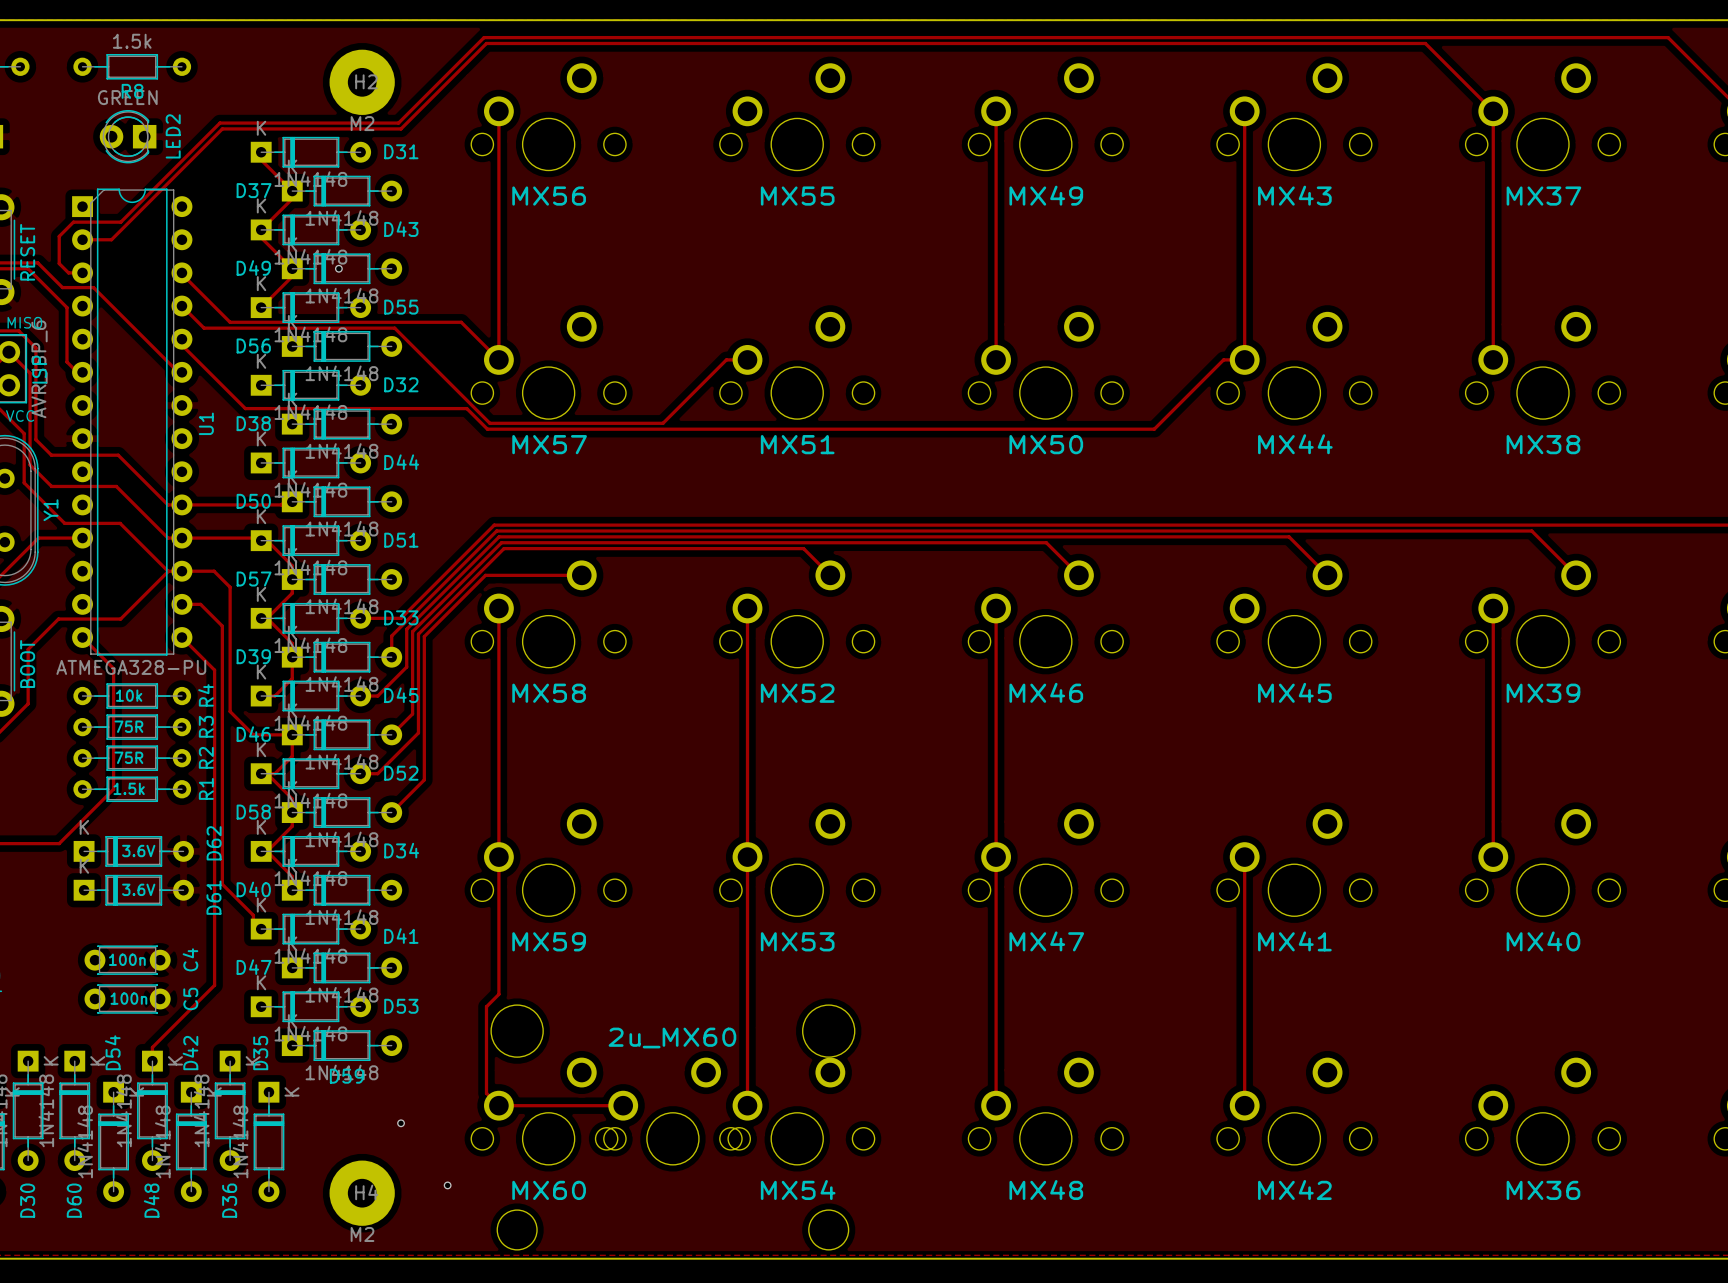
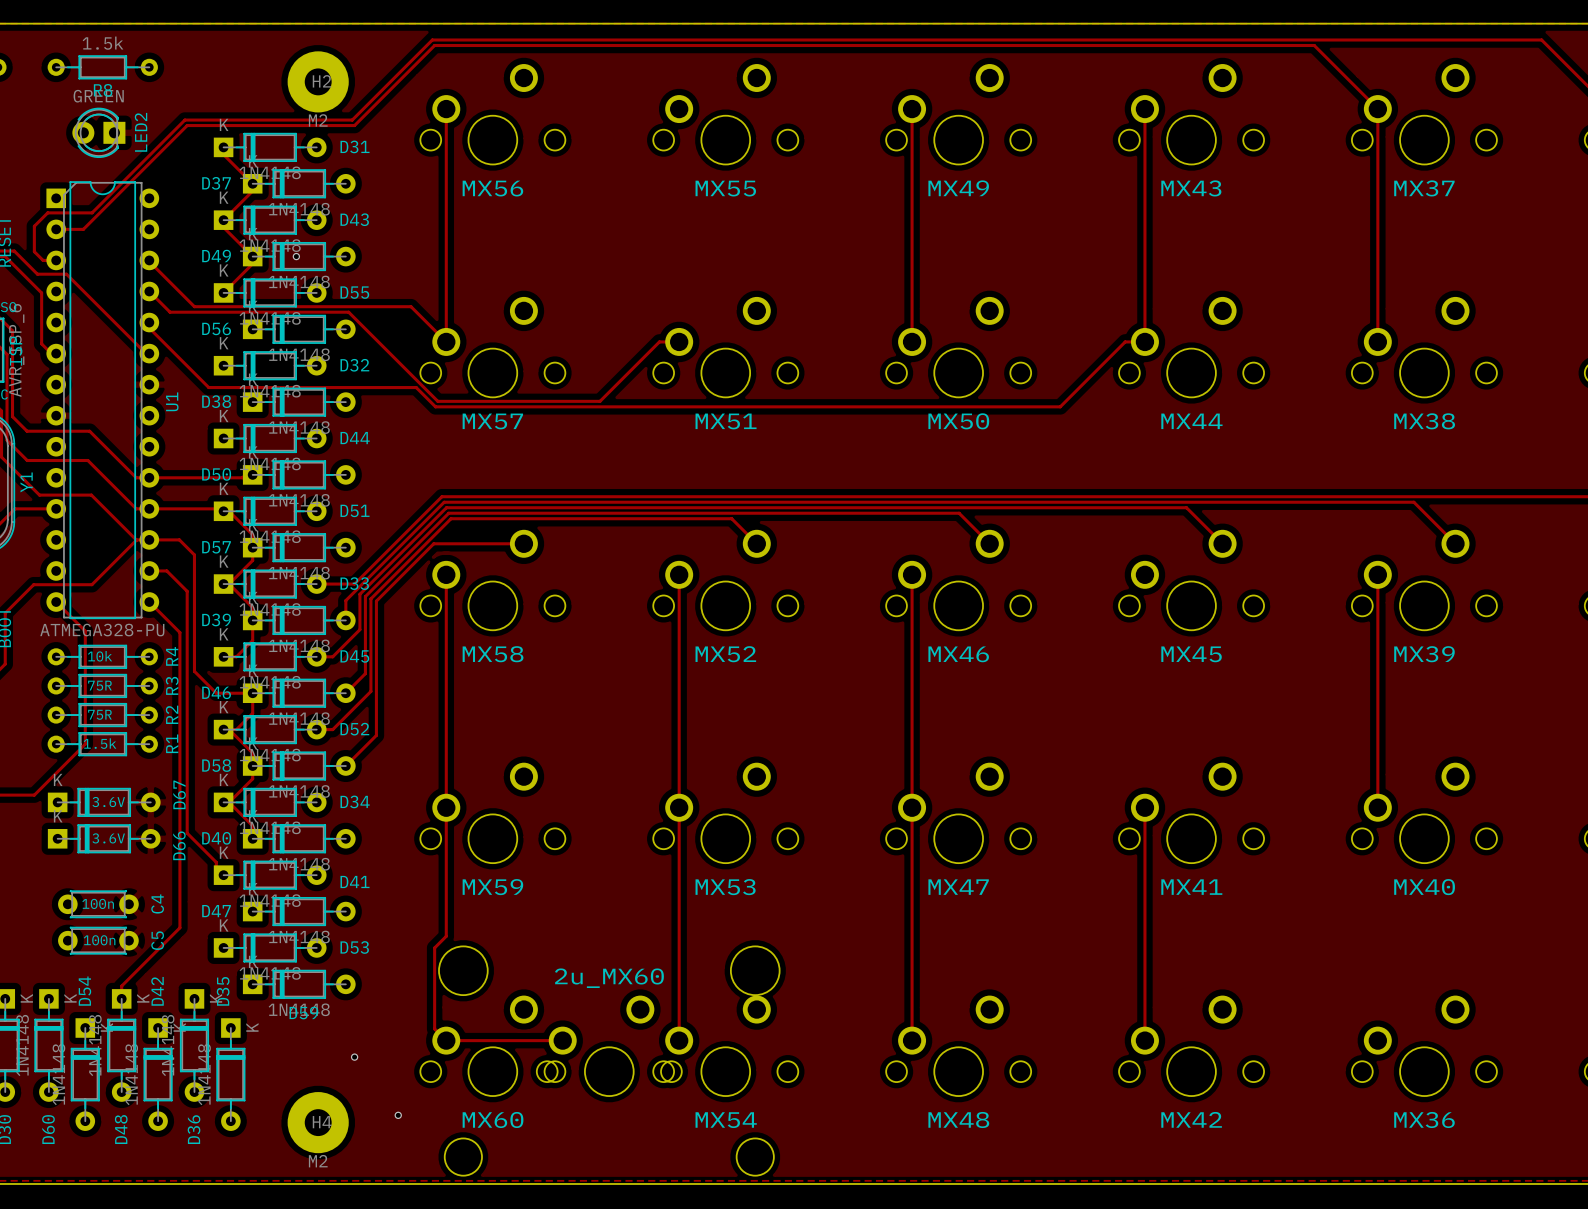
D62 name: D62 (214, 843) -> D67 (179, 794)
D61 name: D61 (213, 897) -> D66 (179, 845)

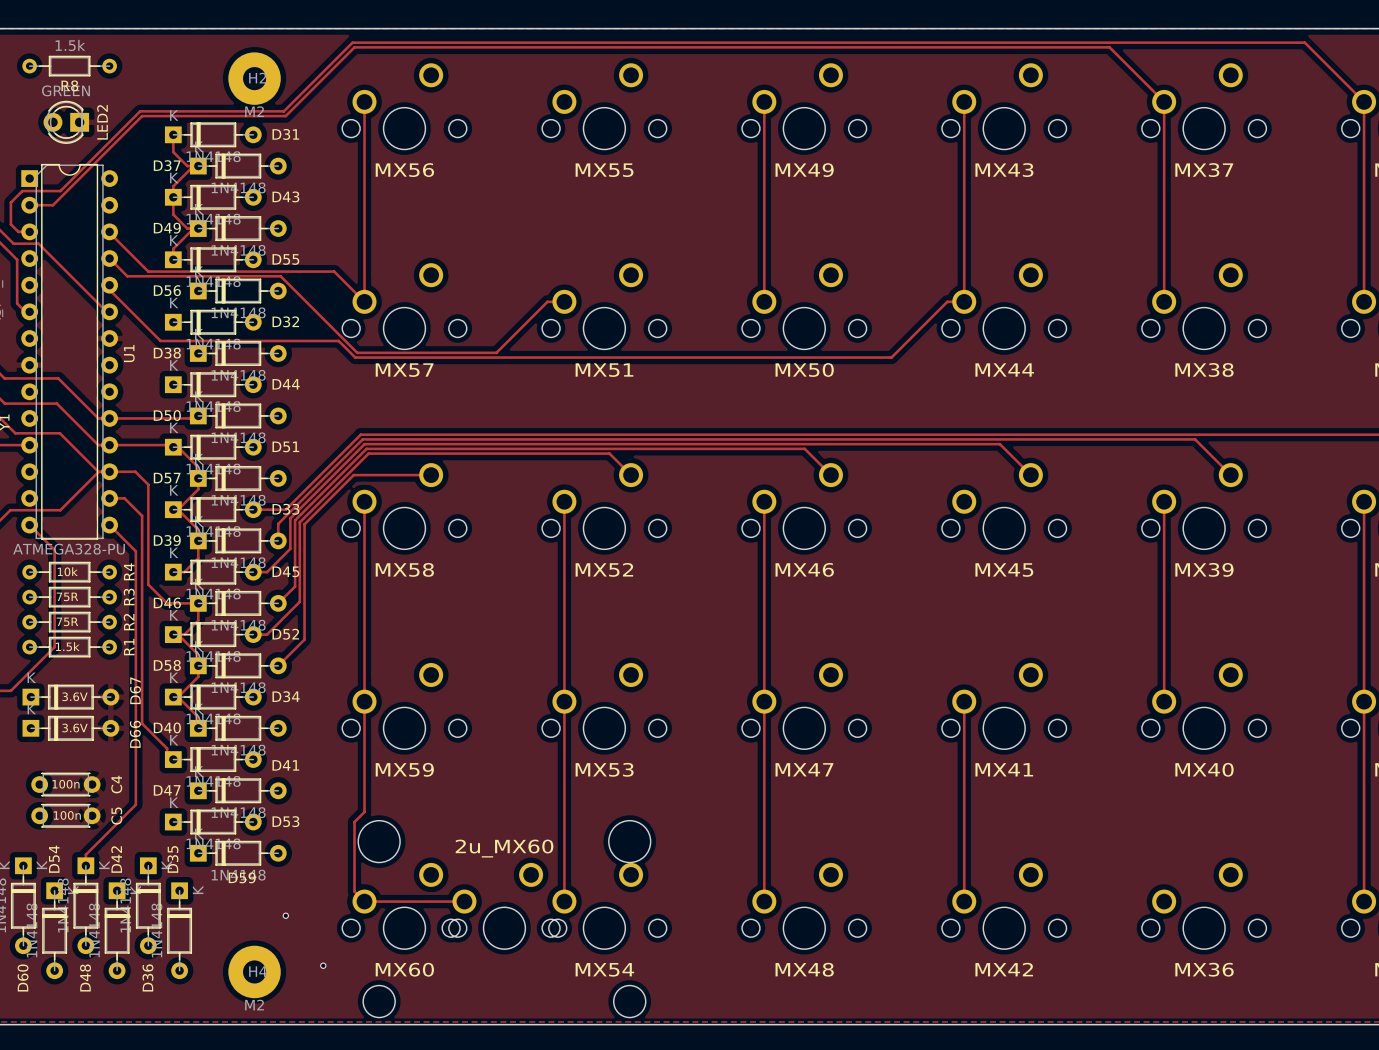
track: (223, 154) (252, 183) (252, 191) (223, 220) -> (193, 166) (173, 186) (173, 197)
track: none -> (173, 141) (173, 152) (187, 166) (198, 166)
track: (223, 227) (252, 256) (252, 263) (223, 292) -> (193, 228) (173, 248) (173, 259)
track: none -> (173, 203) (173, 214) (187, 228) (198, 228)
via: (296, 256) -> none

